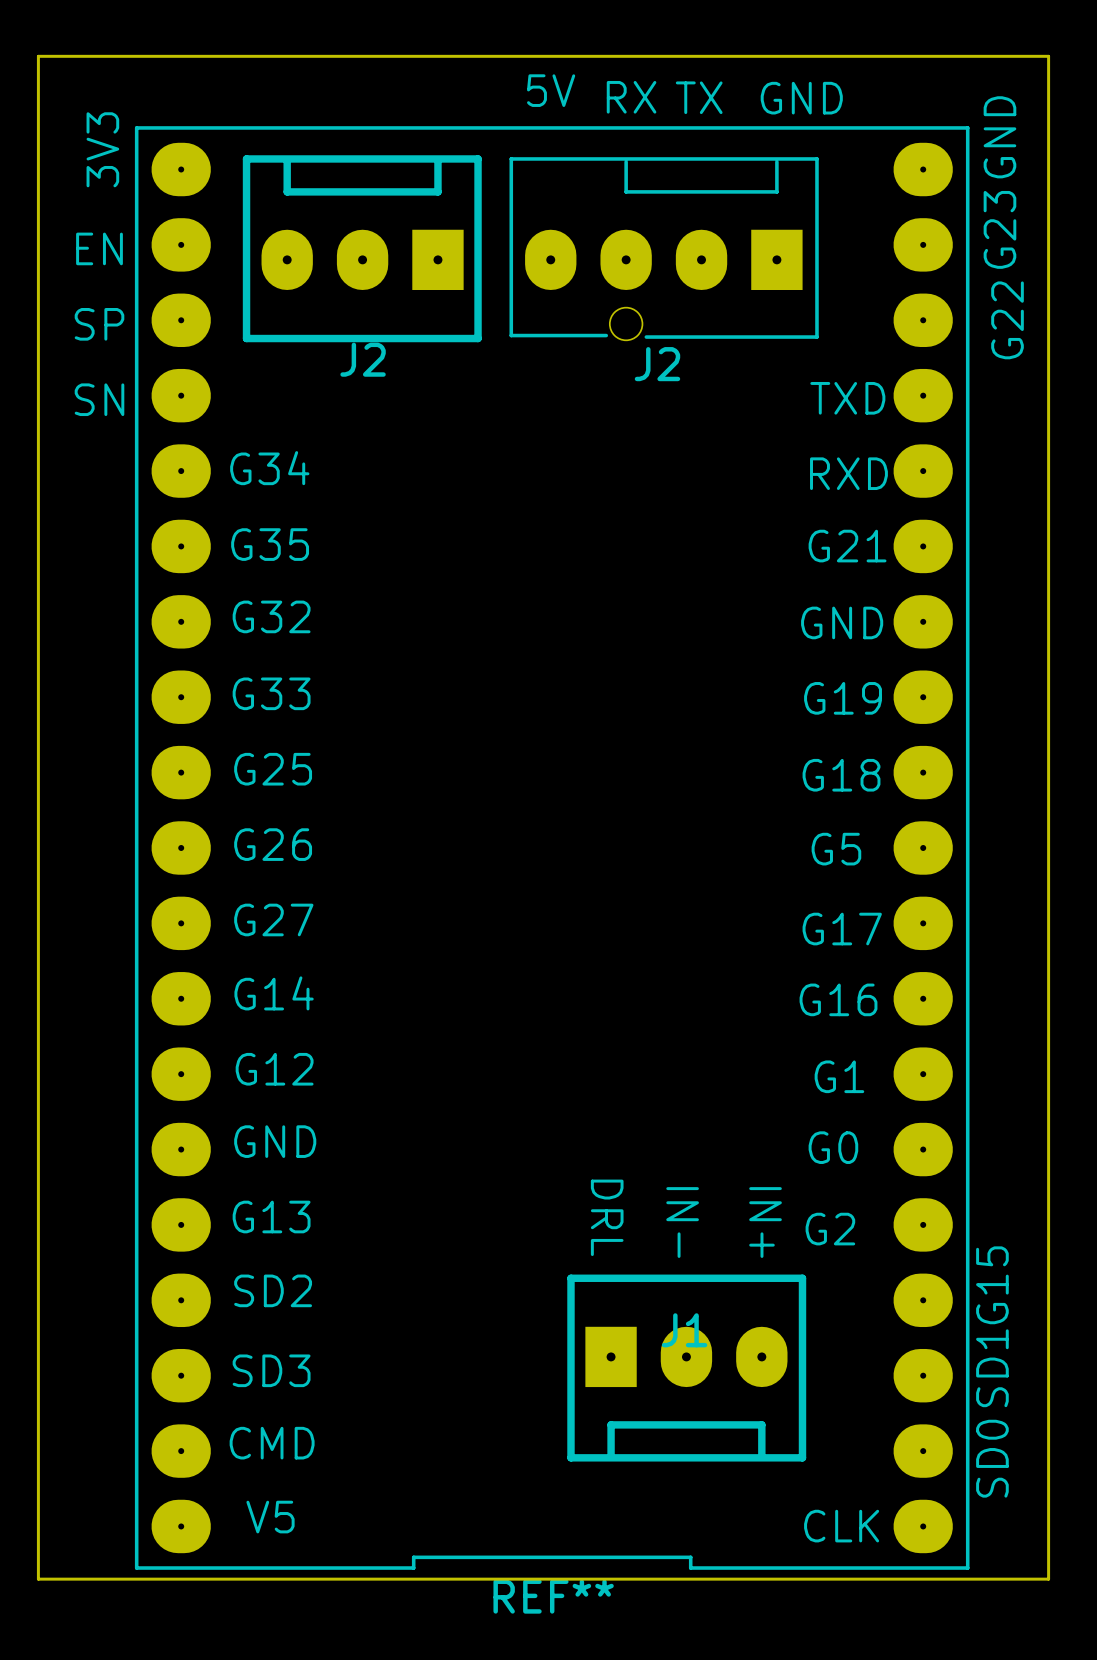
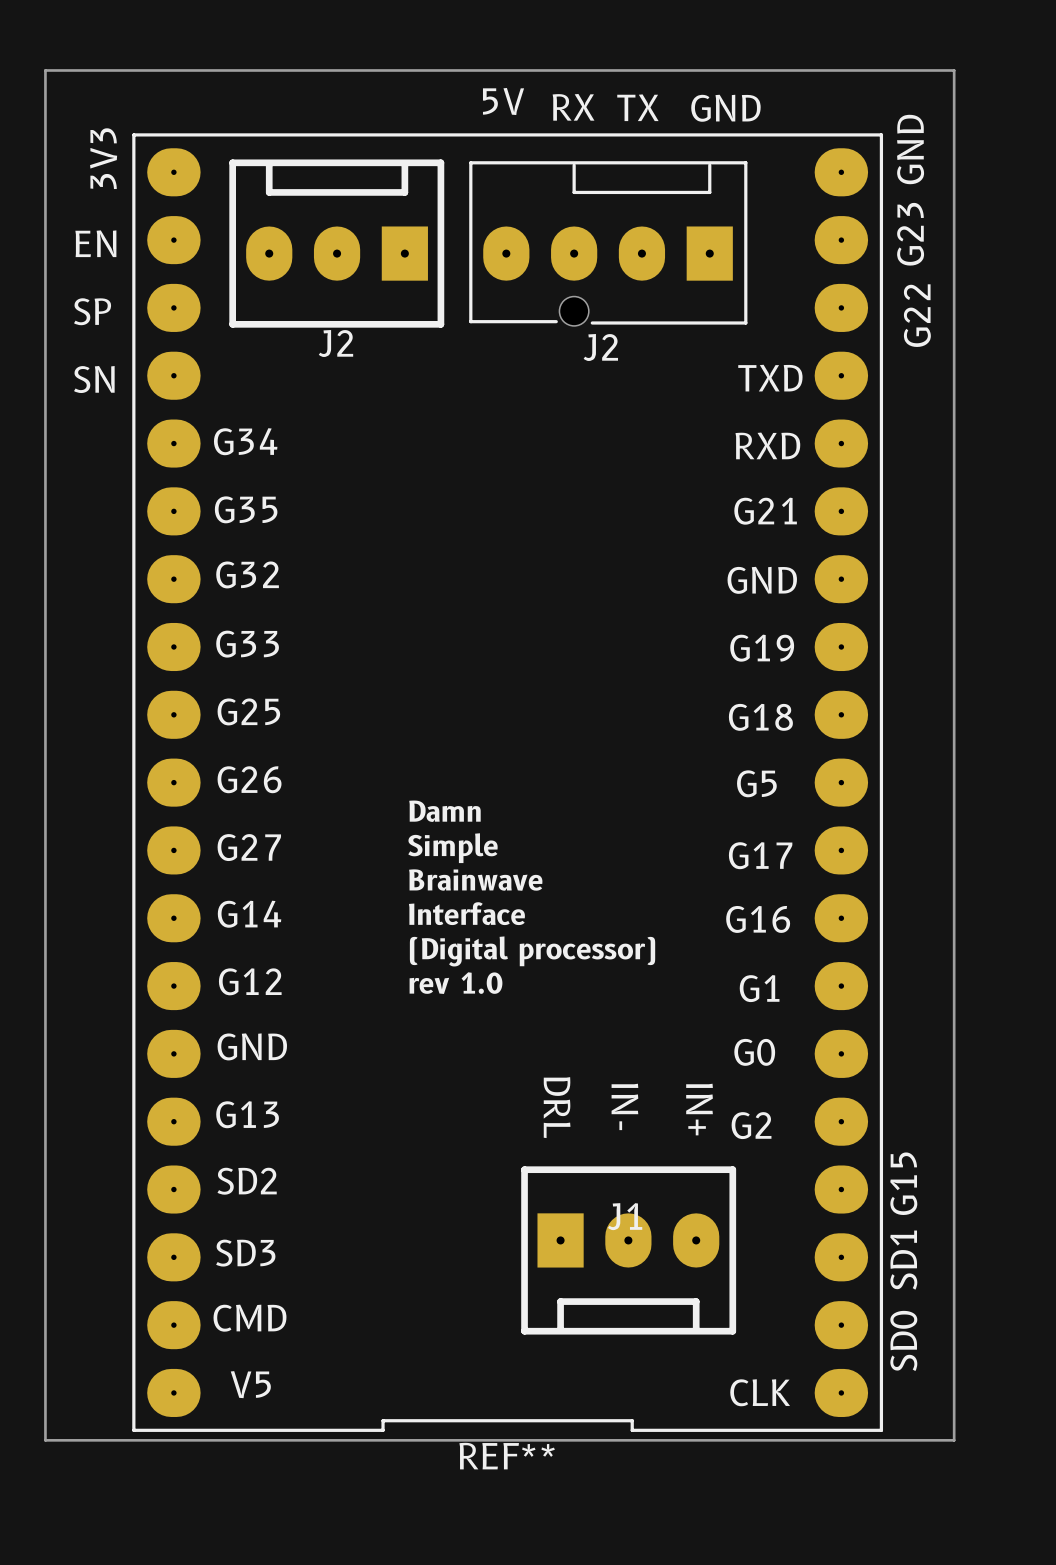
text: none -> Damn (444, 811)
text: none -> Simple (452, 848)
text: none -> Brainwave (475, 880)
text: none -> Interface (466, 913)
text: none -> (Digital processor) (532, 951)
text: none -> rev 1.0 (456, 983)

